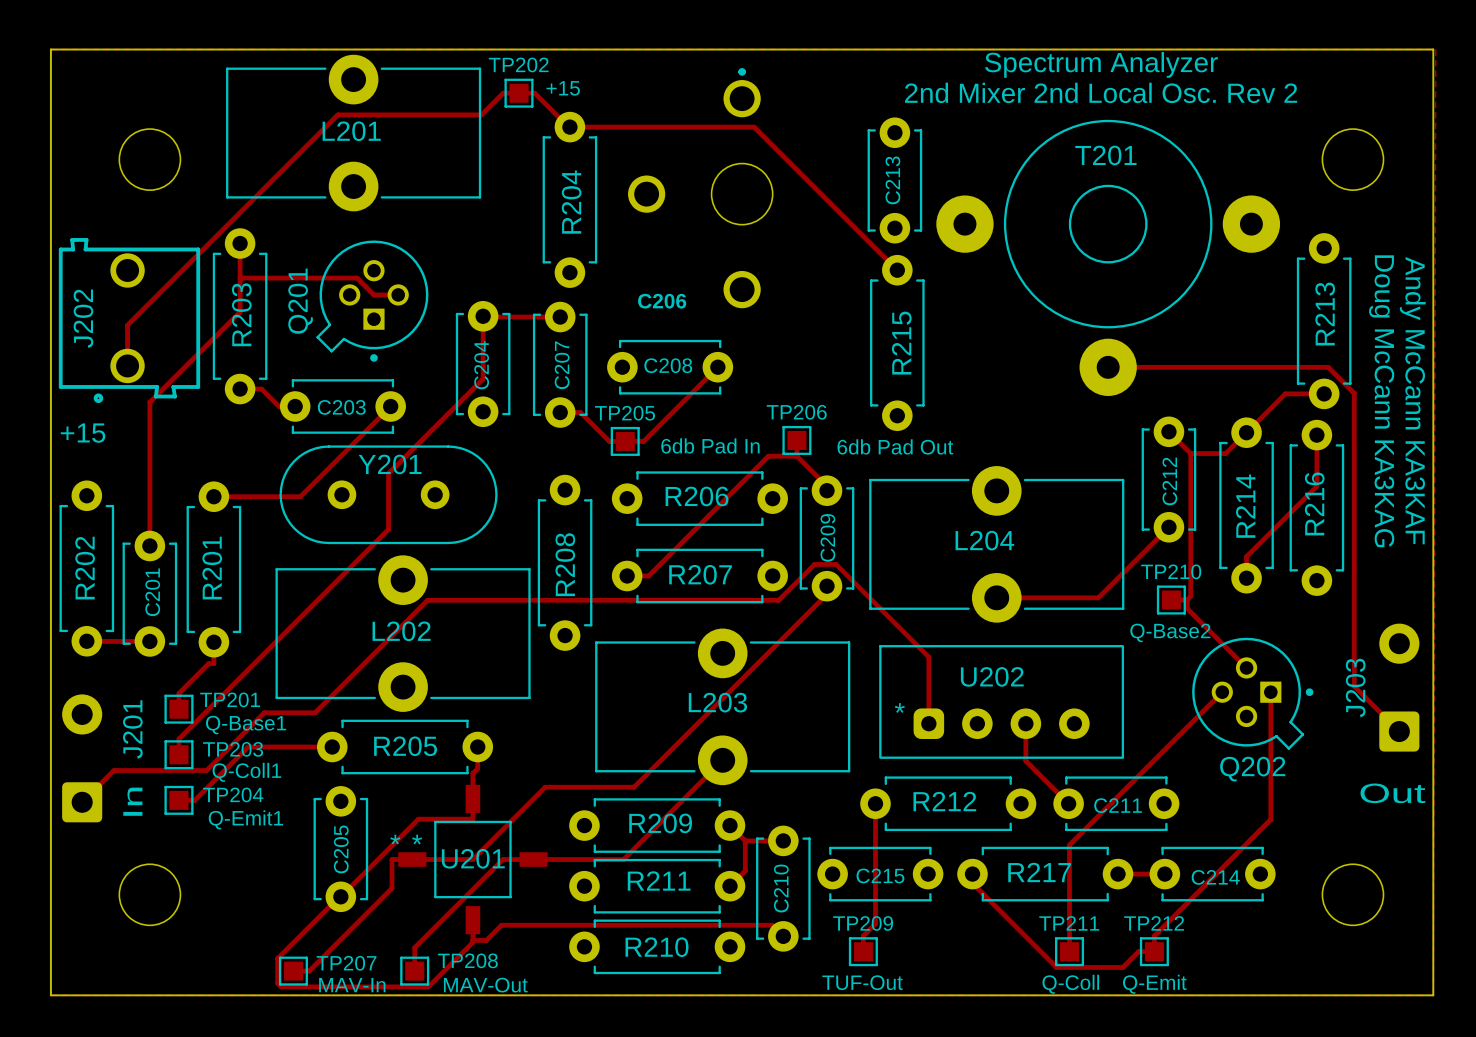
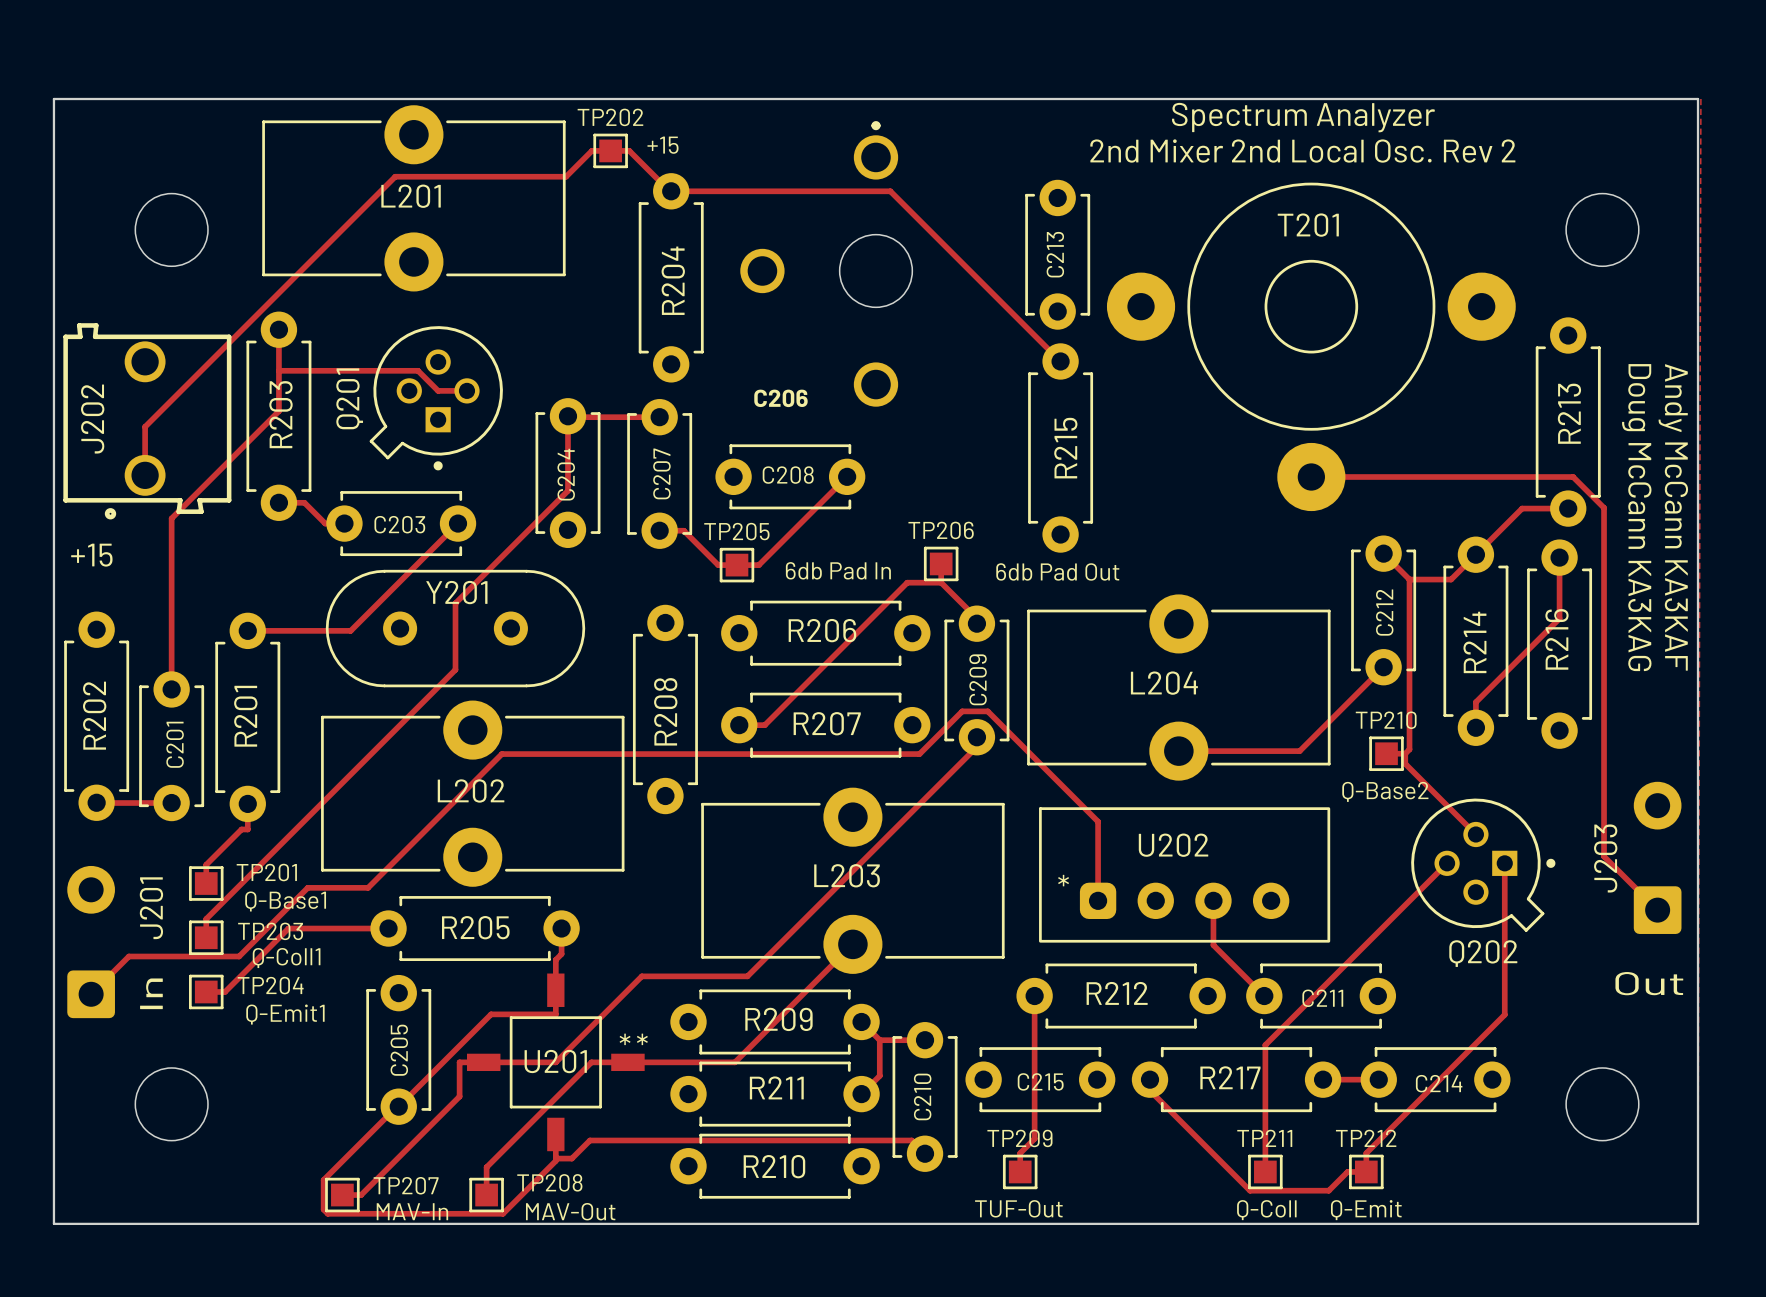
U201 text position: * (395, 839) -> * (625, 1039)
U201 text position: * (417, 839) -> * (642, 1039)

